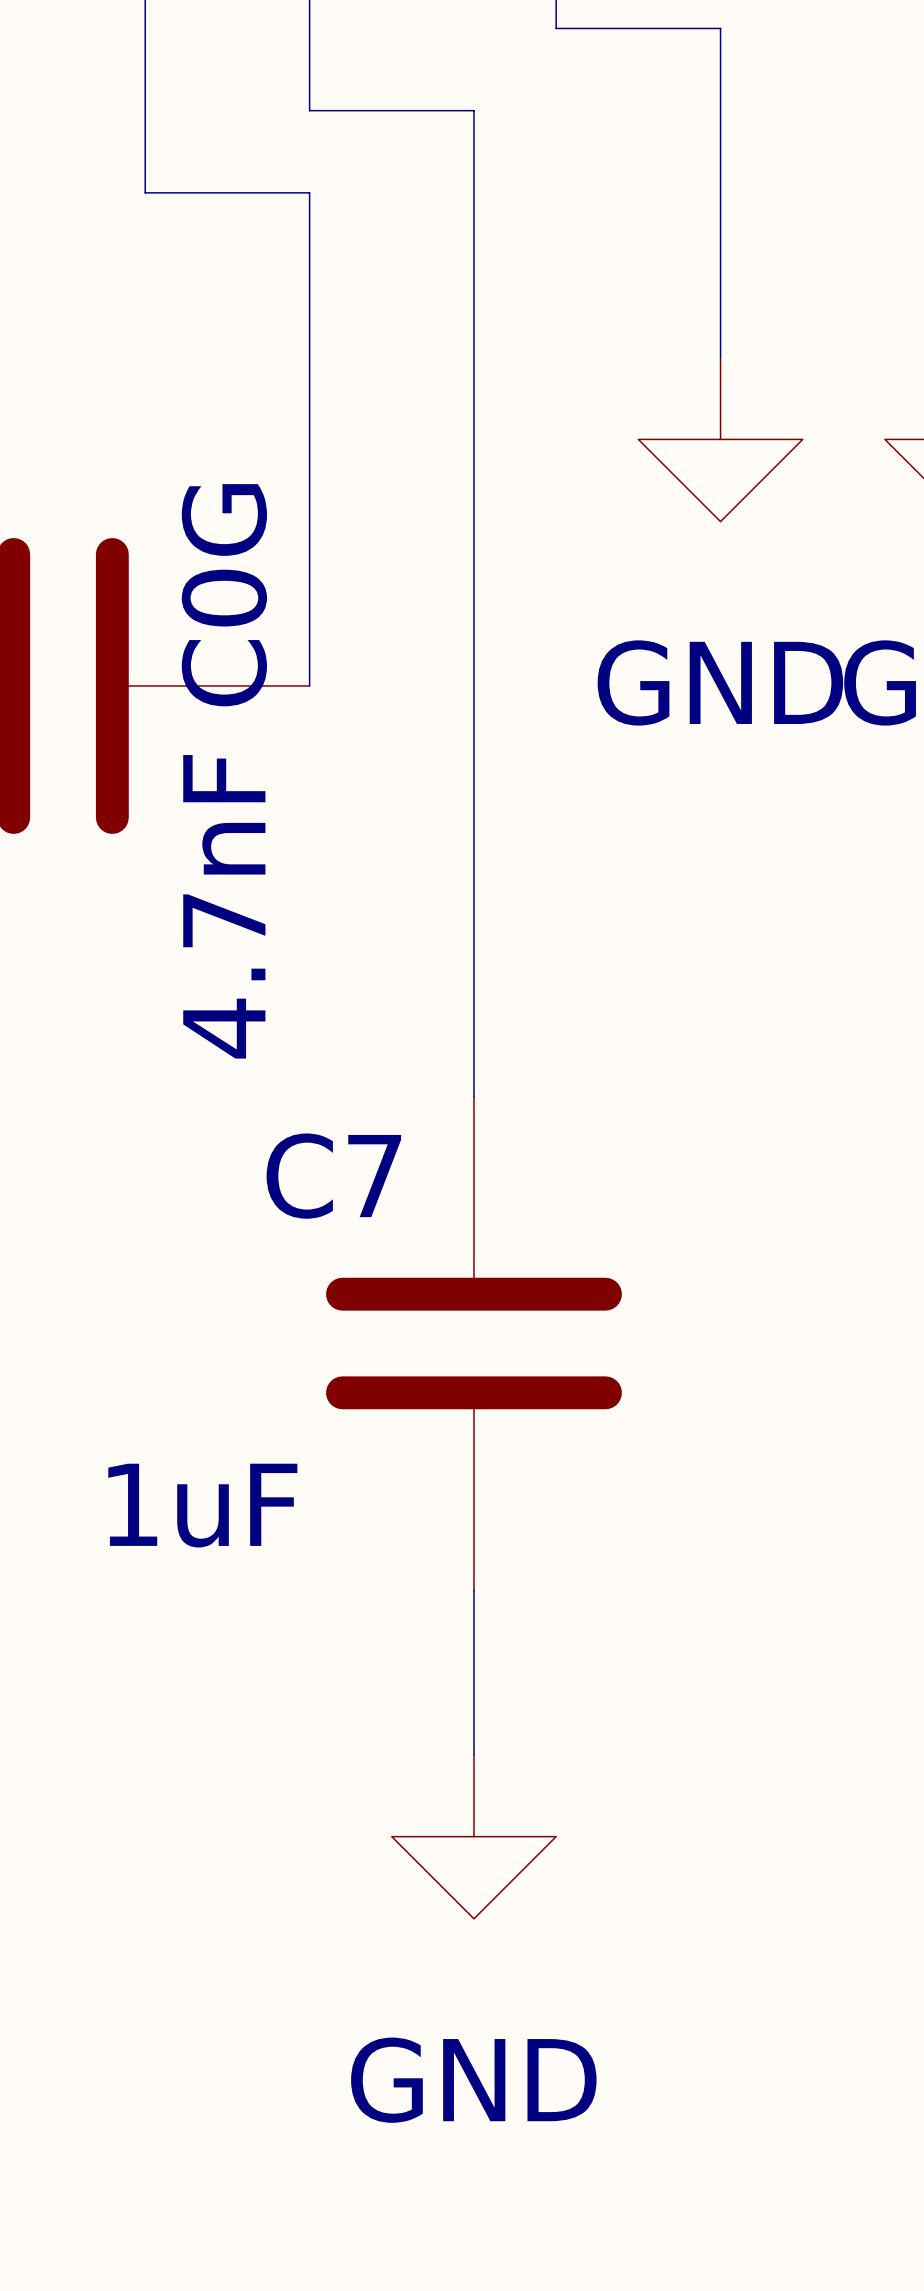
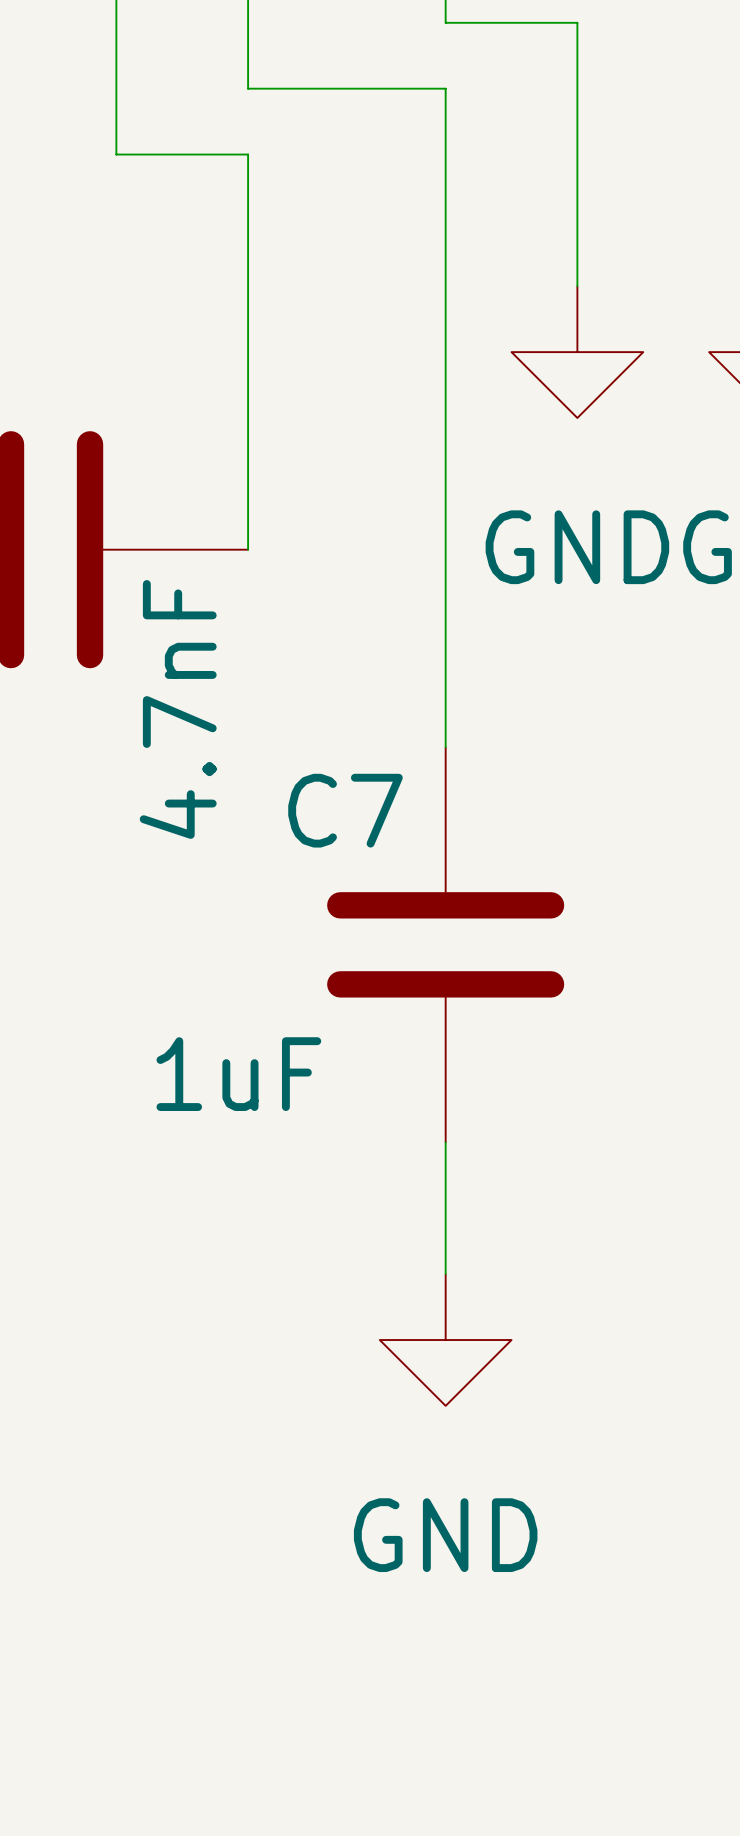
wire: (473, 110) (473, 1096) -> (379, 88) (445, 88) (445, 747)
part value: 4.7nF C0G (224, 771) -> 4.7nF (178, 709)
C7 position: (473, 1343) -> (445, 944)
wire: (473, 1590) (473, 1754) -> (445, 1142) (445, 1274)
power symbol position: GND (473, 1836) -> GND (445, 1340)

